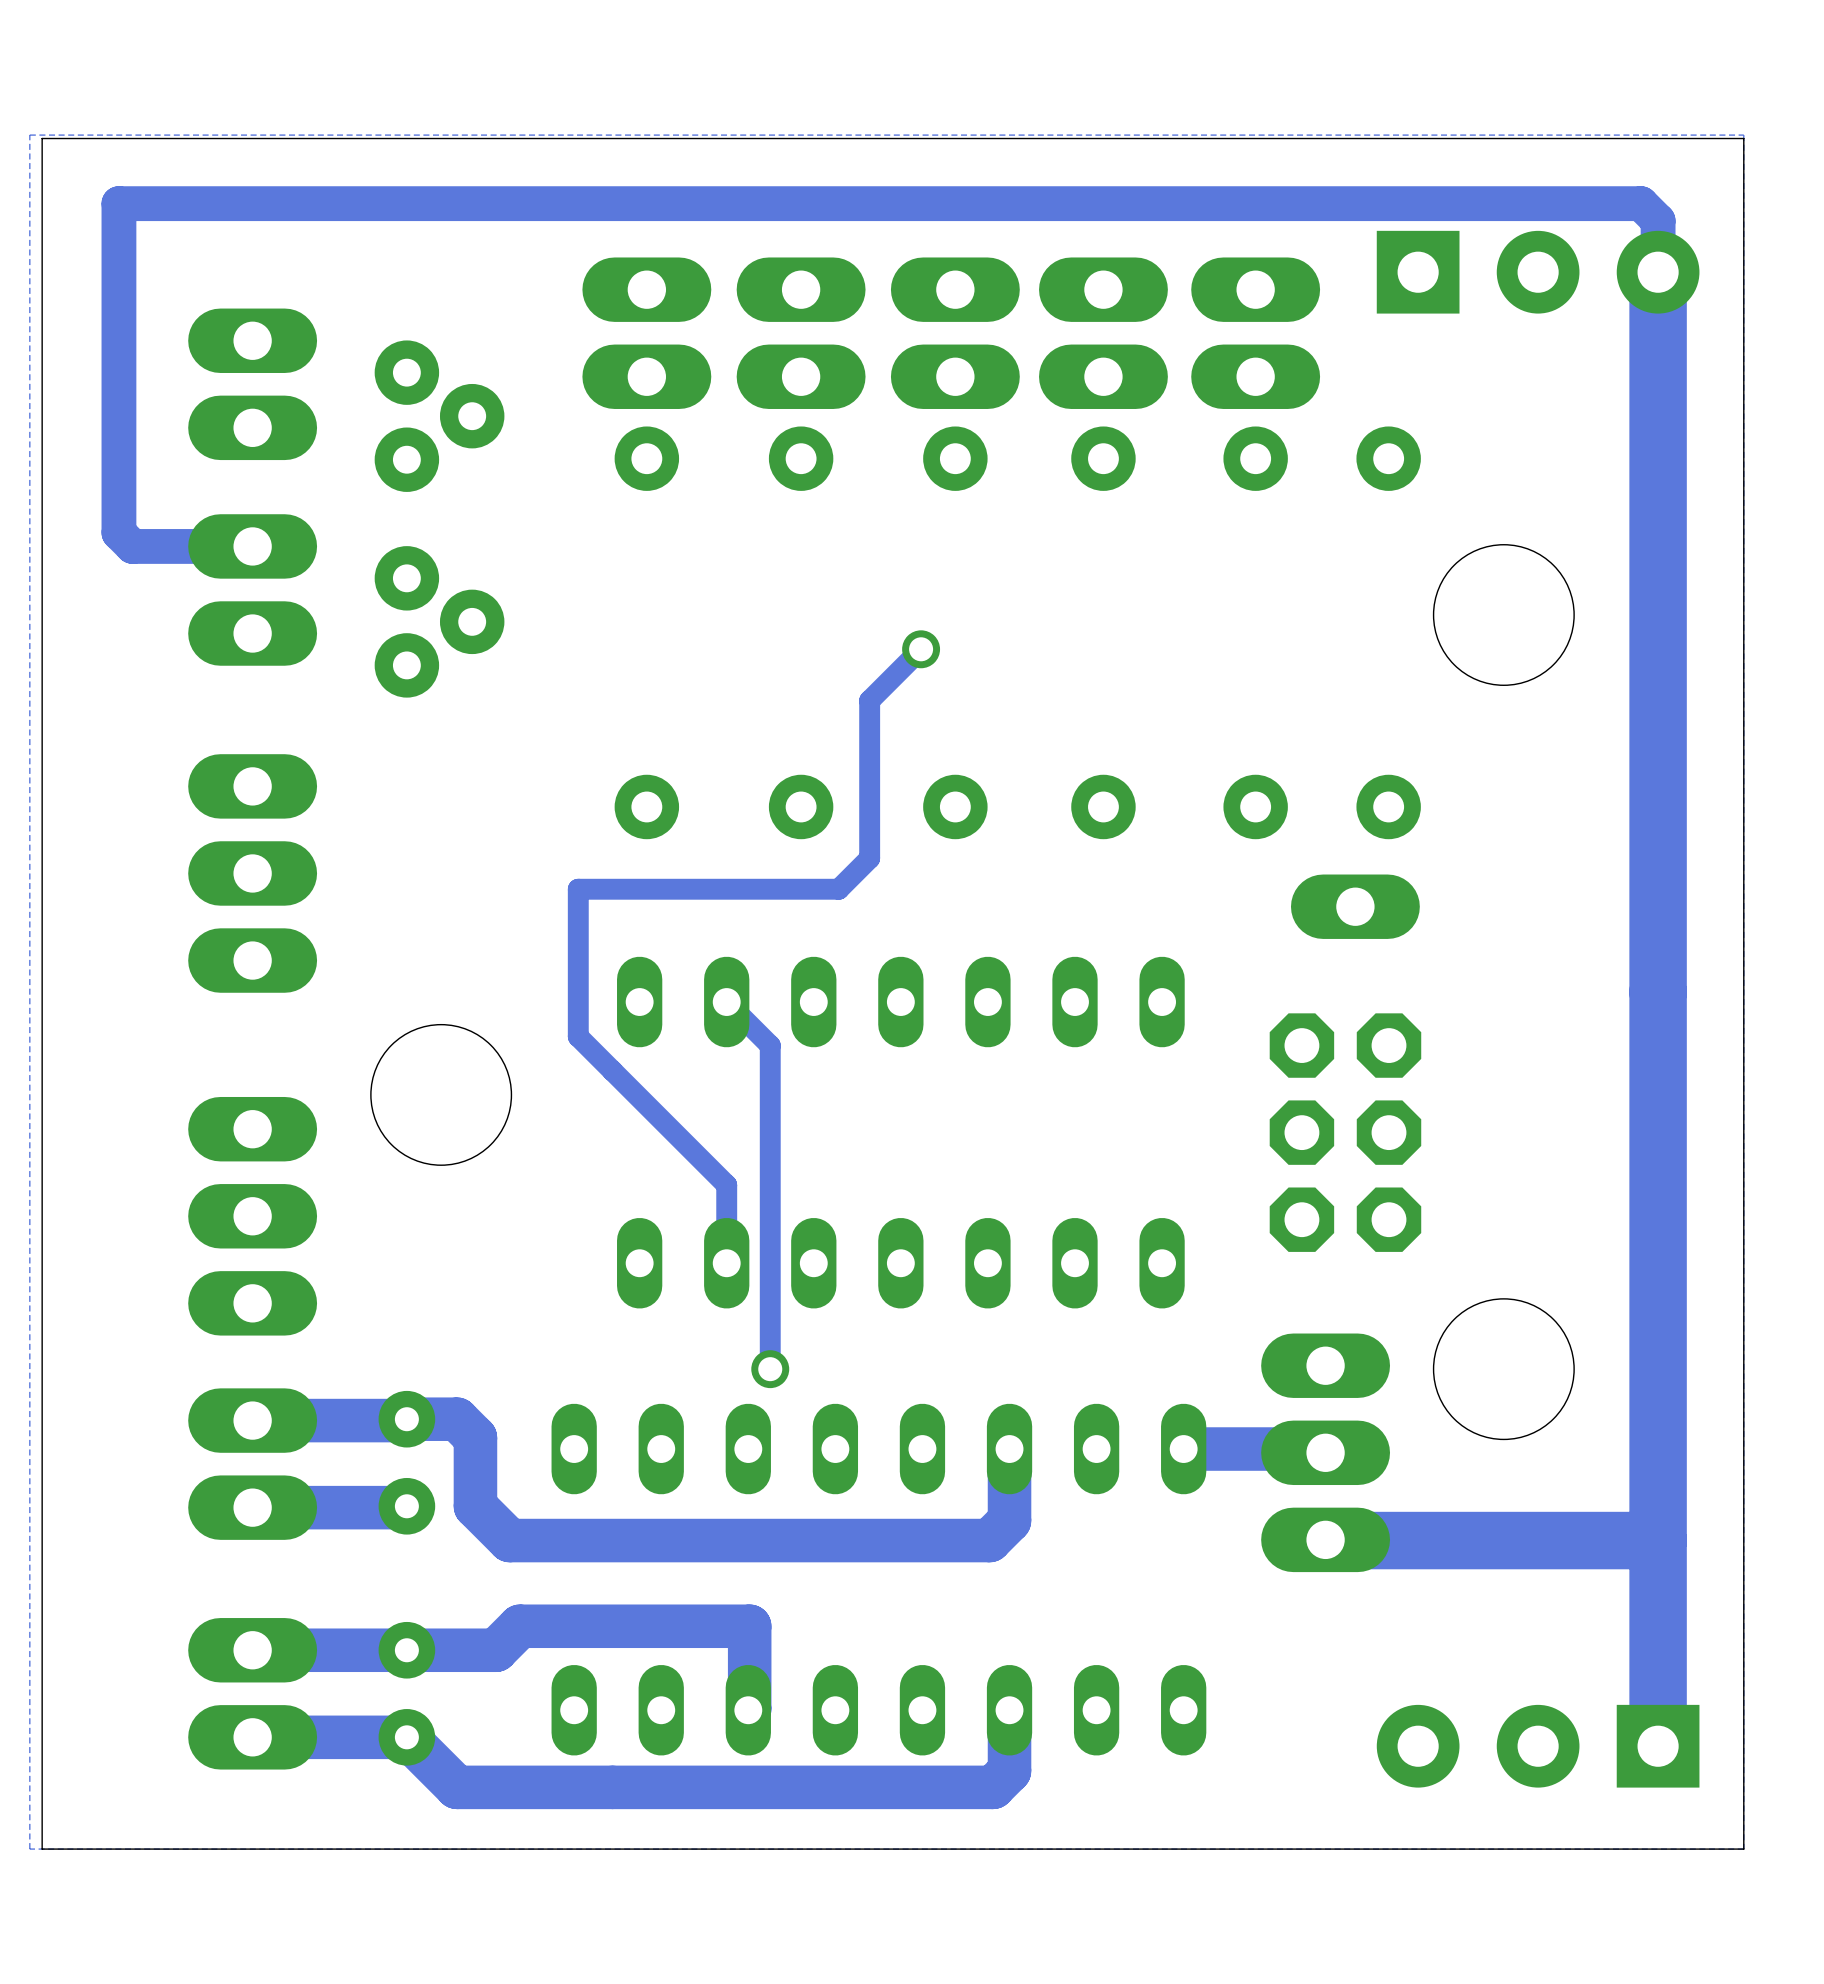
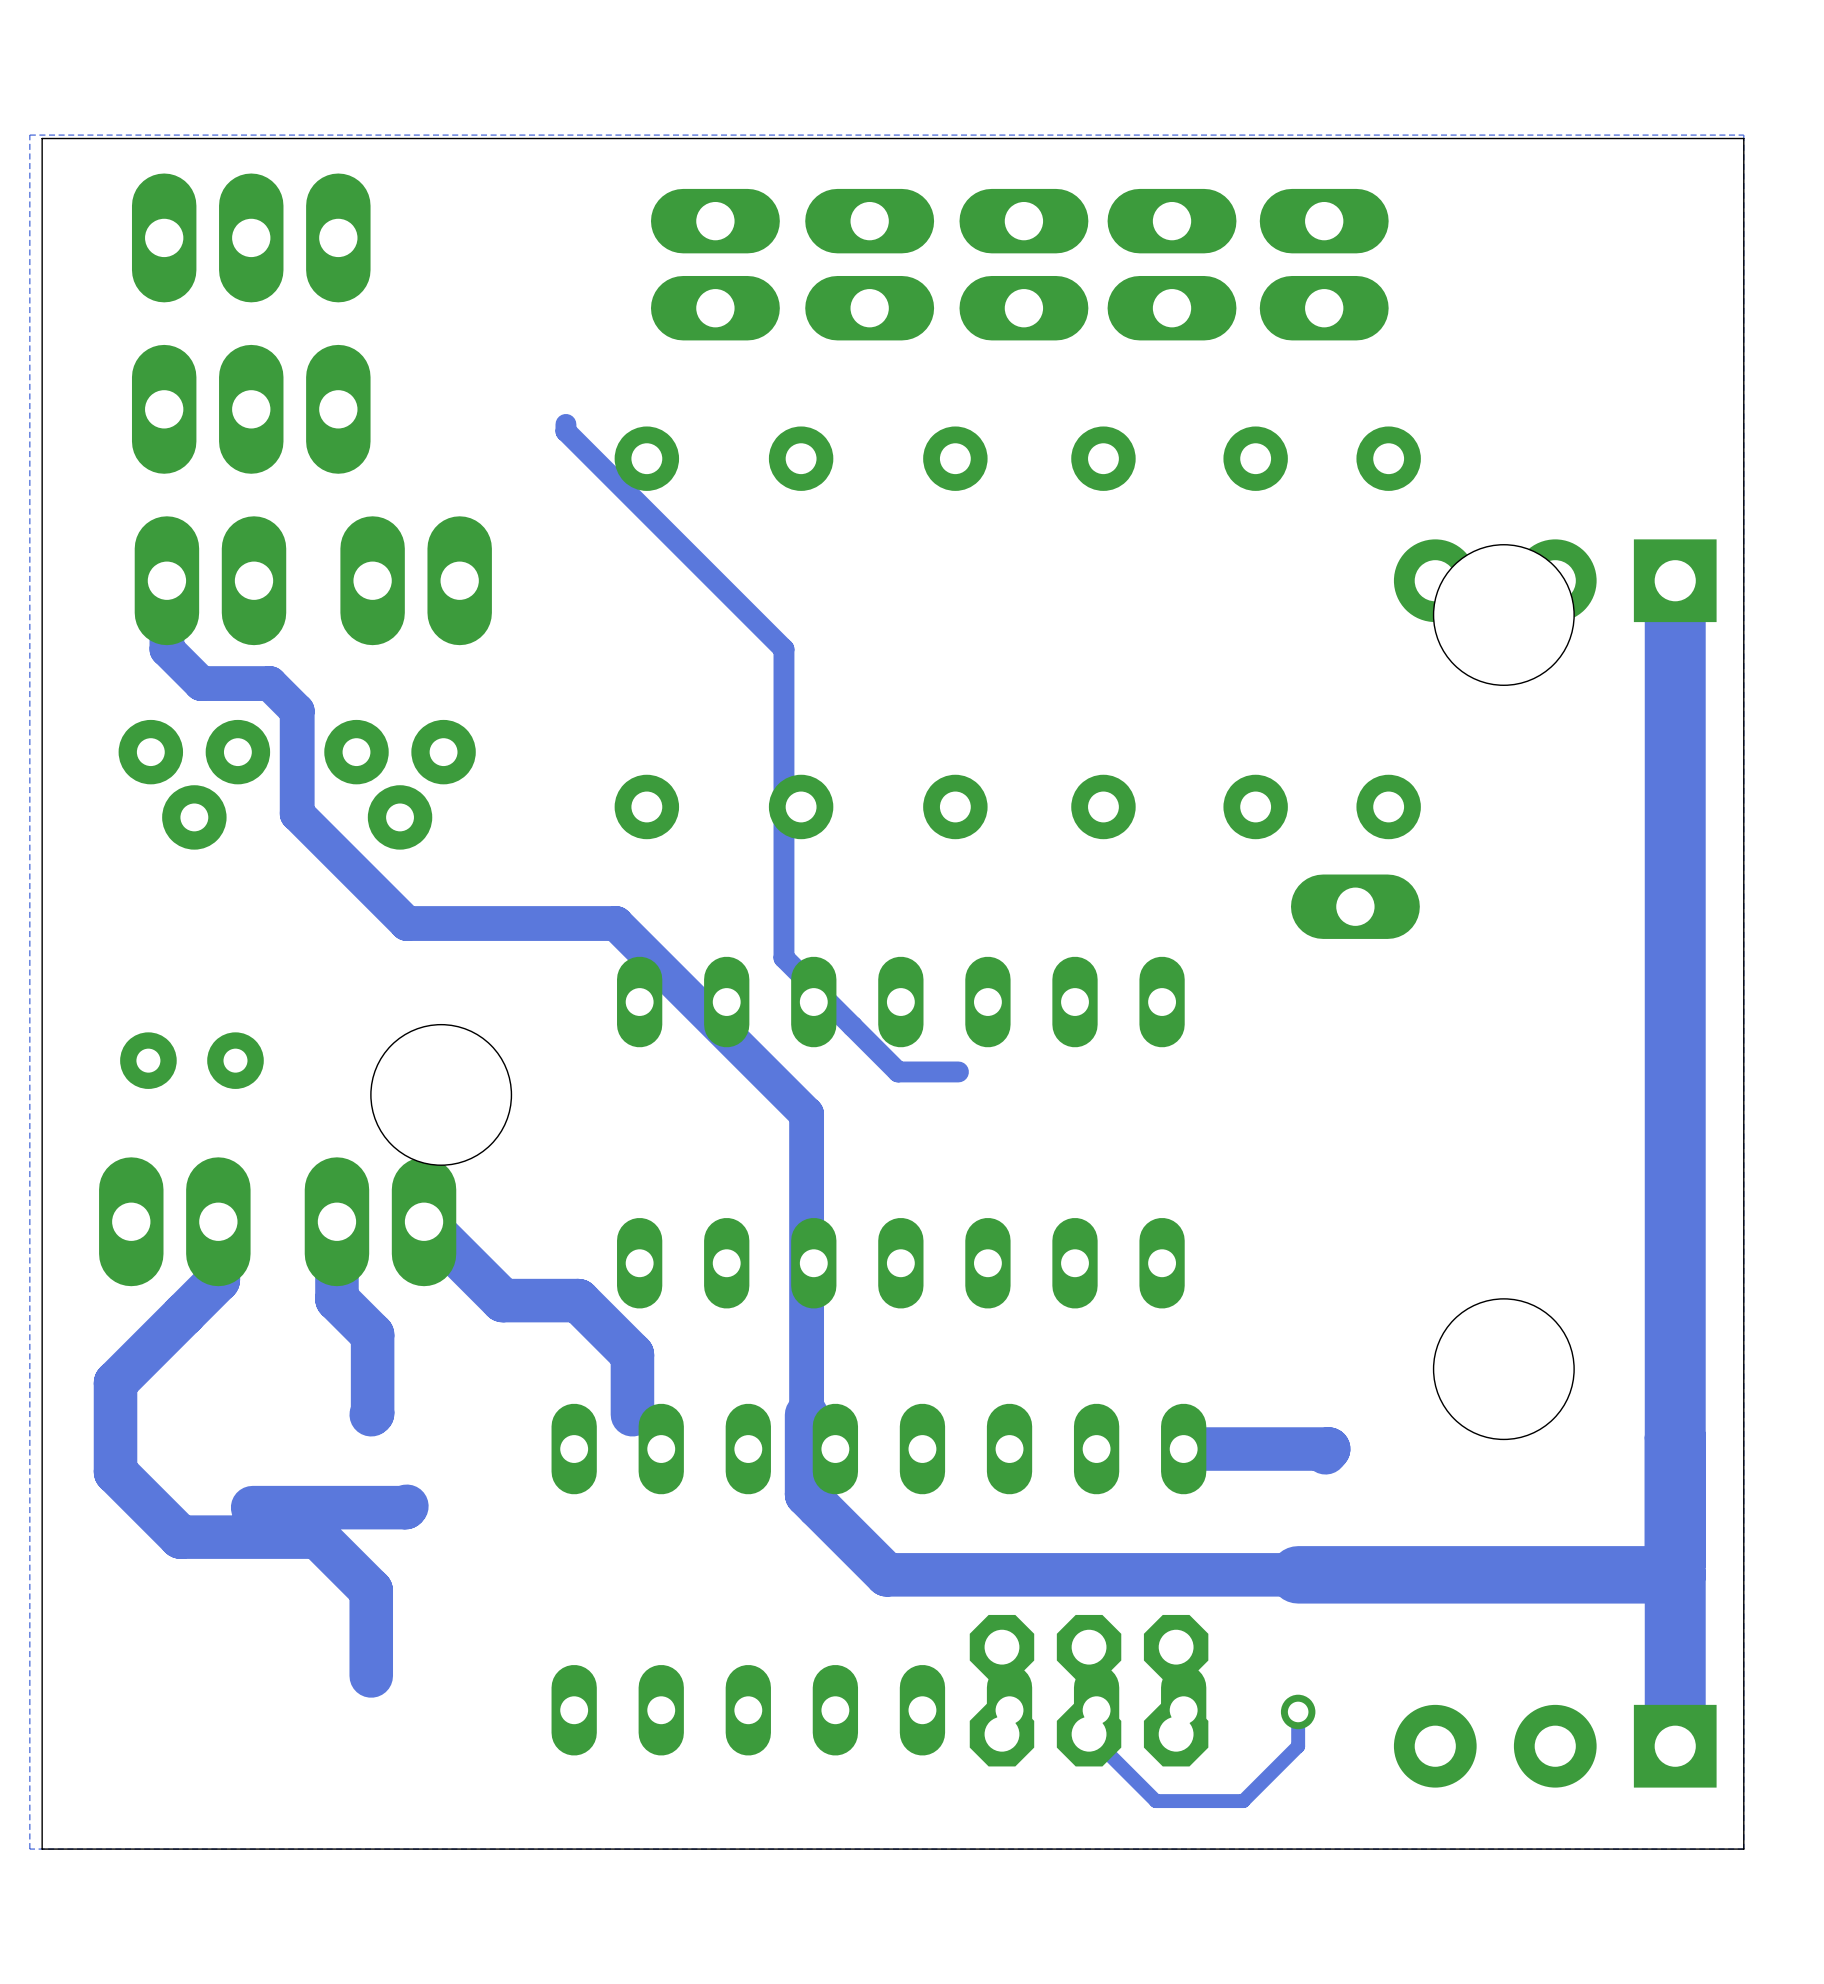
part: none -> (251, 237)
part: none -> (715, 264)
part: none -> (869, 264)
part: none -> (1023, 264)
part: none -> (1172, 264)
part: none -> (1324, 264)
part rotation: 0° (1538, 272) -> 180° (1555, 580)
part position: (1538, 272) -> (1555, 580)
part footprint: [188, 308, 318, 461] -> [131, 344, 371, 474]
part: (646, 333) -> none
part: (801, 333) -> none
part: (955, 333) -> none
part: (1103, 333) -> none
part: (1255, 333) -> none
part: (439, 416) -> none
track: none -> (565, 424) (565, 431) (783, 649) (783, 957) (898, 1071) (958, 1071)
track: (252, 546) (132, 546) (118, 532) (118, 203) (1640, 203) (1658, 220) (1658, 1746) -> none
track: none -> (166, 580) (166, 649) (201, 683) (269, 683) (297, 710) (297, 813) (406, 923) (615, 923) (806, 1114) (806, 1494) (886, 1574) (1675, 1574)
part: none -> (416, 580)
track: none -> (1675, 580) (1675, 1746)
part rotation: 0° (252, 589) -> 90° clockwise (210, 580)
part: (439, 621) -> none
track: (921, 649) (869, 700) (869, 858) (838, 889) (578, 889) (578, 1036) (726, 1185) (726, 1263) -> none
via: (921, 649) -> none
part: none -> (194, 784)
part: none -> (400, 784)
part: (252, 873) -> none
track: (726, 1002) (770, 1045) (770, 1369) -> none
part: none -> (191, 1060)
part rotation: 0° (1345, 1132) -> 90° clockwise (1089, 1690)
part position: (1345, 1132) -> (1089, 1690)
part: (252, 1216) -> none
part: none -> (174, 1221)
track: none -> (218, 1221) (218, 1280) (115, 1382) (115, 1472) (180, 1537) (317, 1537) (371, 1590) (371, 1675)
track: none -> (336, 1221) (336, 1299) (372, 1334) (371, 1414)
part: none -> (380, 1221)
track: none -> (424, 1221) (502, 1300) (578, 1300) (632, 1354) (632, 1414)
via: (770, 1369) -> none
track: (252, 1420) (456, 1419) (475, 1437) (475, 1506) (509, 1540) (989, 1540) (1009, 1520) (1009, 1449) -> none
part: (1325, 1452) -> none
part: (406, 1462) -> none
part: (252, 1464) -> none
track: (1325, 1539) (1658, 1540) -> none
track: (252, 1650) (496, 1650) (520, 1626) (749, 1626) (748, 1710) -> none
part: (252, 1693) -> none
part: (406, 1693) -> none
track: (1009, 1710) (1009, 1770) (993, 1787) (456, 1787) (406, 1737) (252, 1737) -> none
track: none -> (1298, 1711) (1298, 1746) (1243, 1801) (1155, 1801) (1089, 1734)
via: none -> (1298, 1711)
part position: (1538, 1746) -> (1555, 1746)

